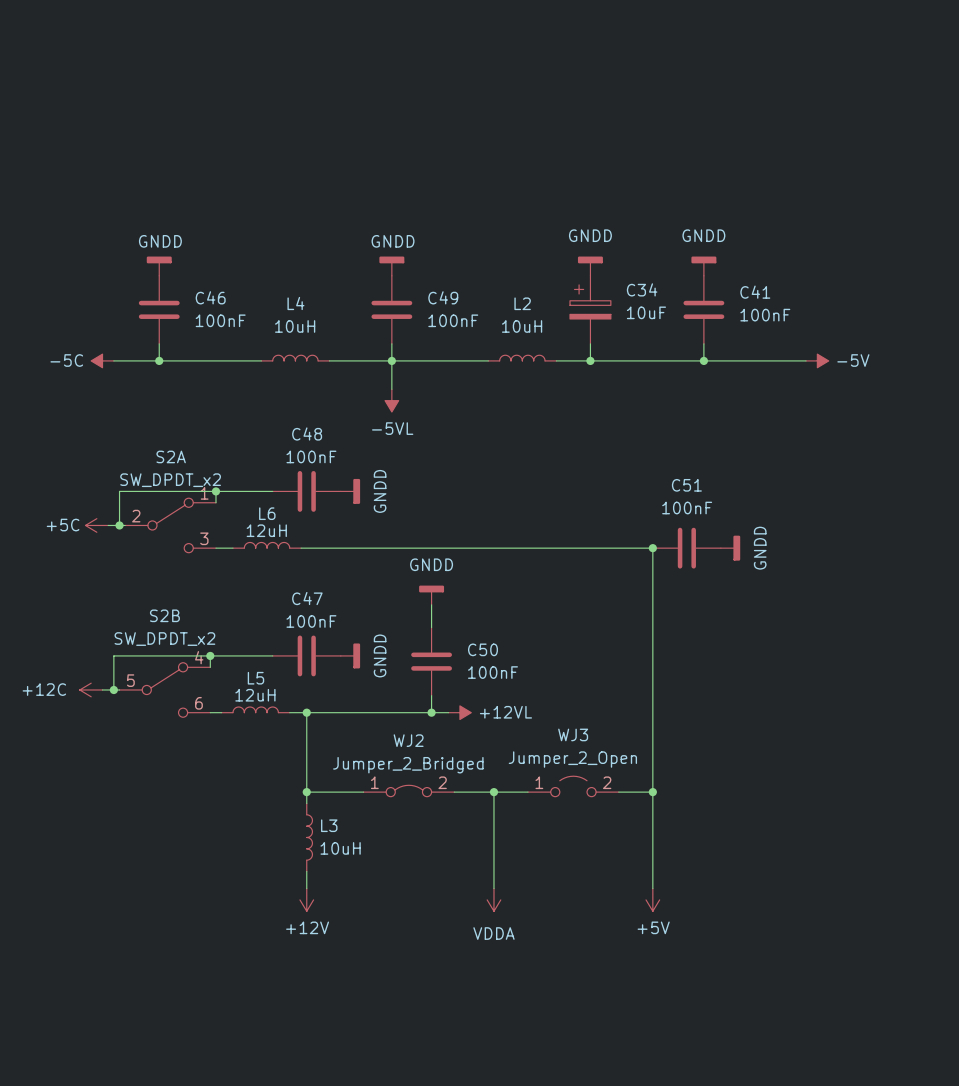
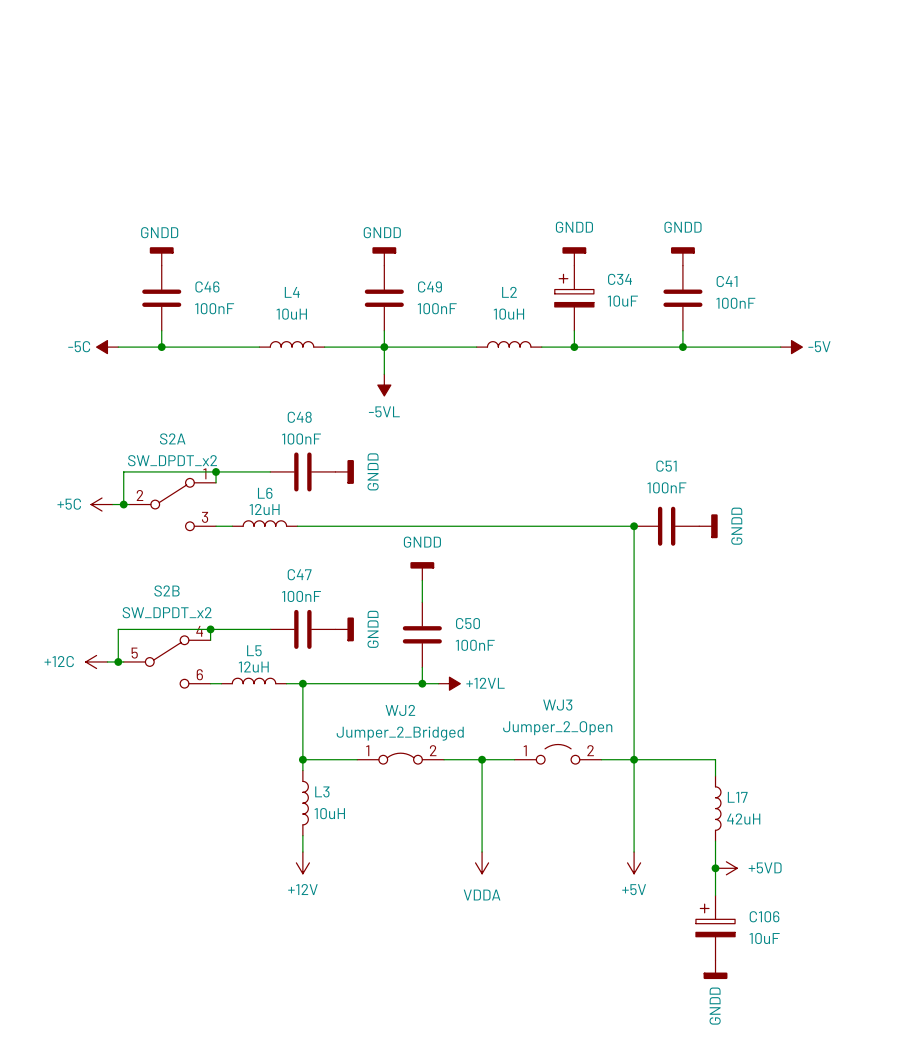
wire: none -> (634, 759) (715, 759) (715, 776)
L17: none -> 42uH (718, 808)
wire: none -> (715, 841) (715, 895)
junction: none -> (715, 868)
power symbol: none -> +5VD (726, 868)
C106: none -> 10uF (715, 928)
power symbol: none -> GNDD (715, 969)

